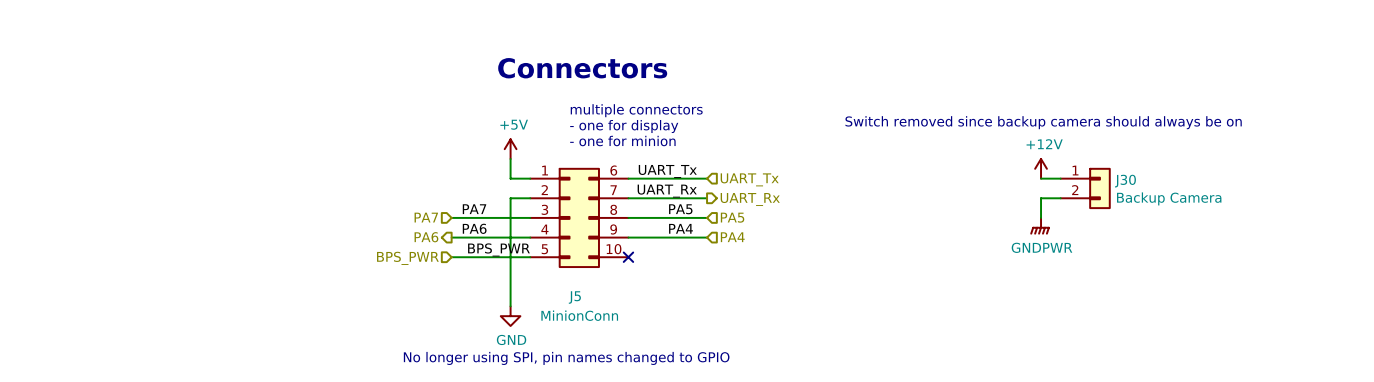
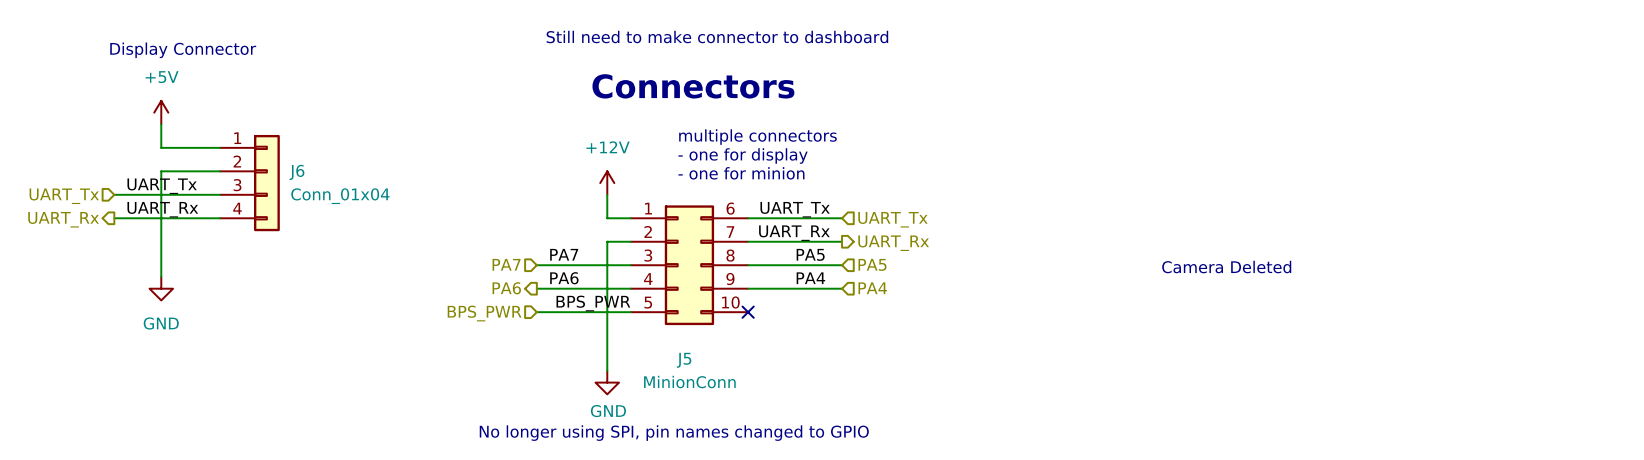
text: none -> Still need to make connector to dashboard (717, 37)
text: none -> Display Connector (183, 50)
power symbol: none -> +5V (161, 112)
wire: none -> (161, 124) (161, 147) (219, 147)
text: Switch removed since backup camera should always be on (1043, 122) -> none
wire: none -> (219, 171) (161, 171) (161, 276)
J6: none -> Conn_01x04 (249, 183)
power symbol: +5V (510, 149) -> +12V (607, 183)
label: none -> UART_Tx (162, 186)
wire: none -> (114, 194) (219, 194)
hierarchical label: none -> UART_Tx (64, 196)
power symbol: +12V (1041, 168) -> none
label: none -> UART_Rx (162, 209)
wire: none -> (114, 218) (219, 218)
wire: (1041, 178) (1060, 178) -> none
hierarchical label: none -> UART_Rx (63, 219)
J30: Backup Camera (1085, 188) -> none
wire: (1060, 198) (1041, 198) (1041, 217) -> none
text: none -> Camera Deleted (1226, 267)
power symbol: GNDPWR (1040, 226) -> none
power symbol: none -> GND (161, 288)

